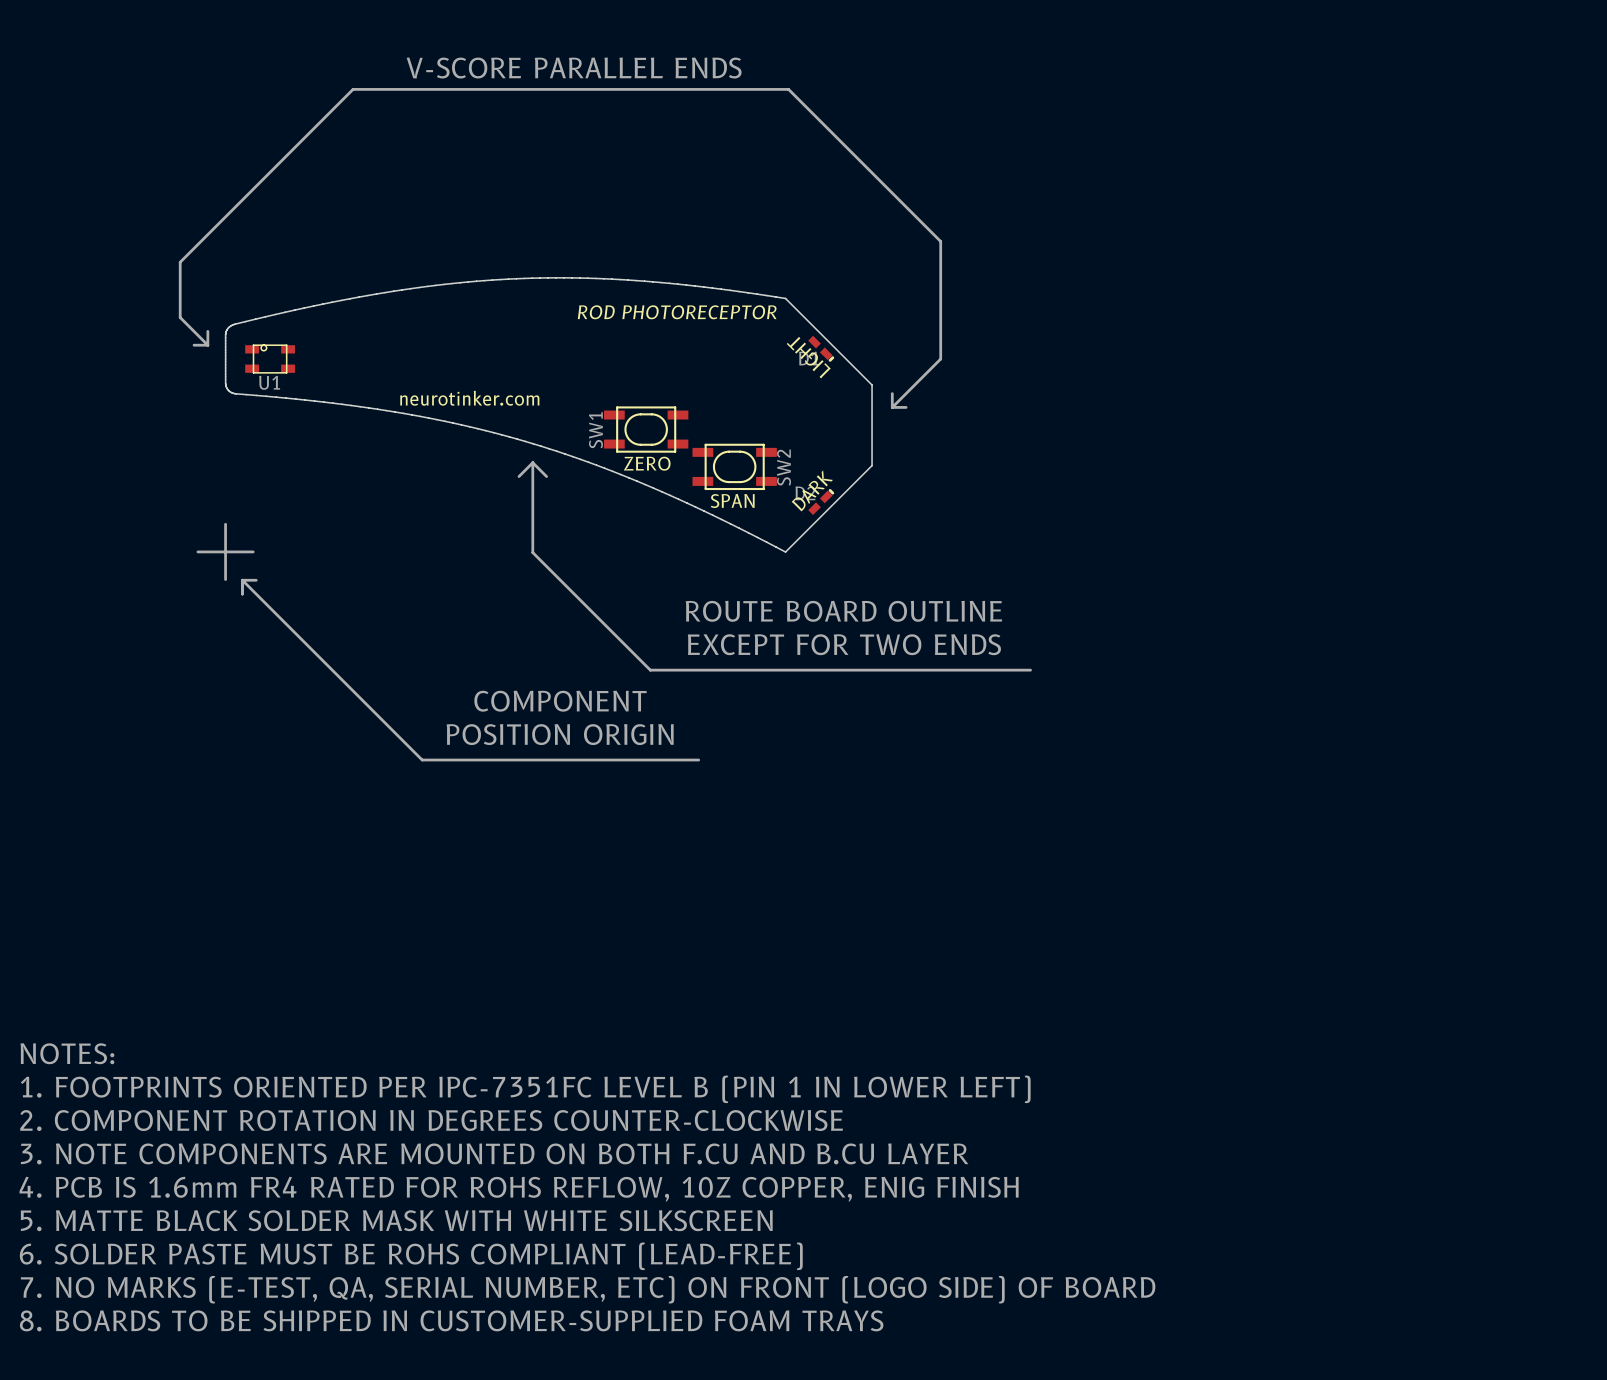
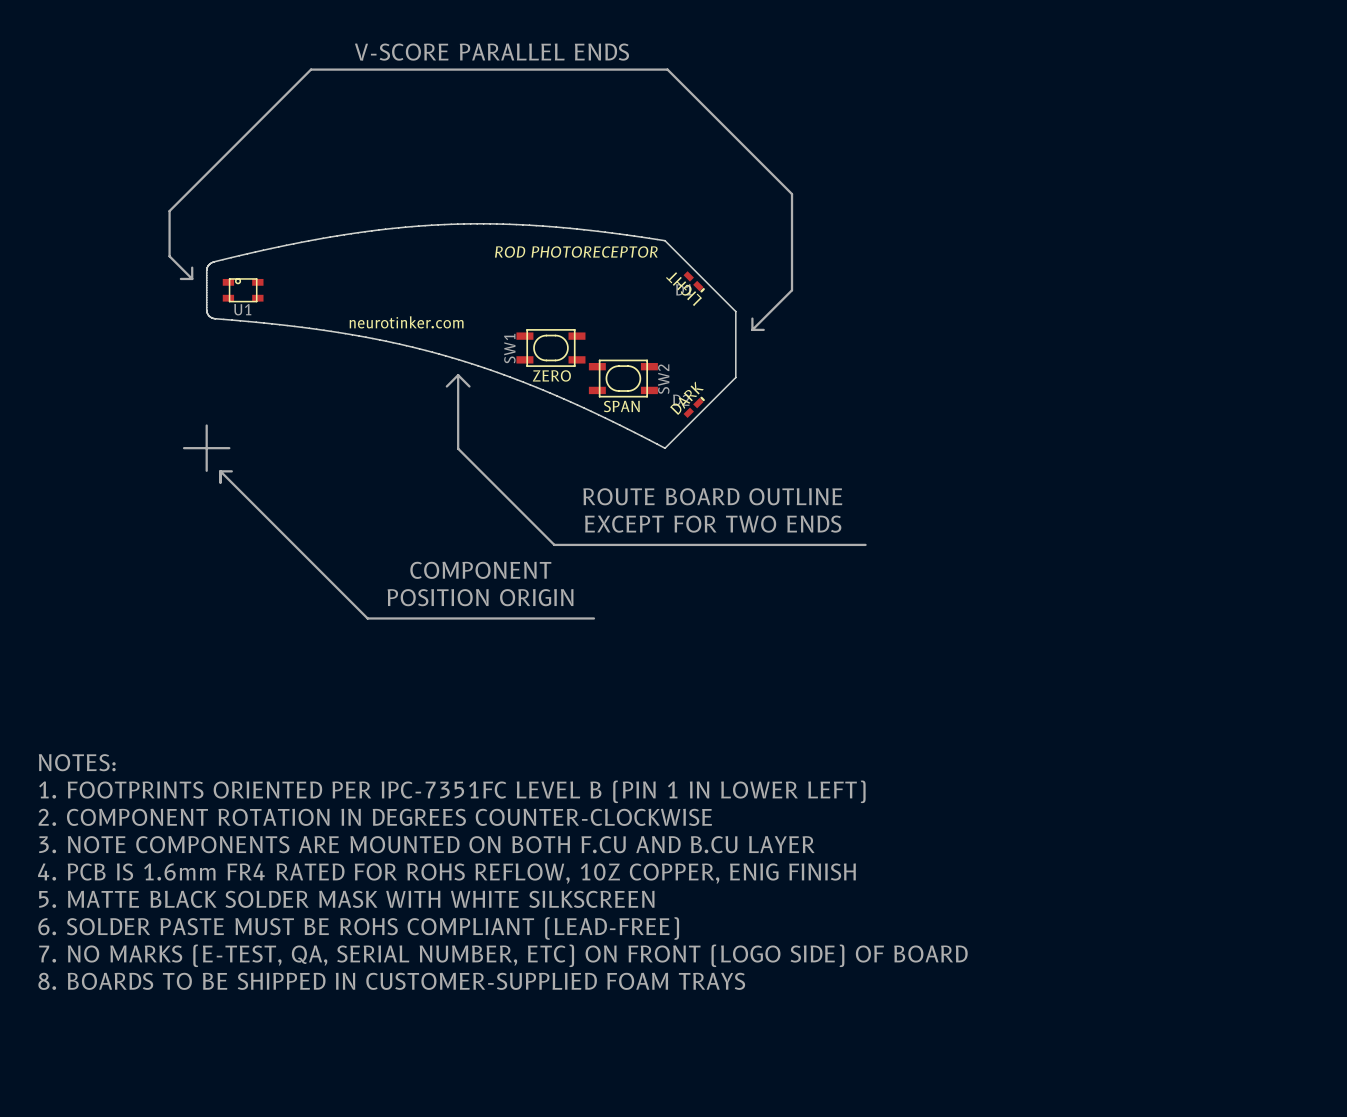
text position: NOTES: (67, 1053) -> NOTES: (77, 762)
text position: 1. FOOTPRINTS ORIENTED PER IPC-7351FC LEVEL B (PIN 1 IN LOWER LEFT) (525, 1089) -> 1. FOOTPRINTS ORIENTED PER IPC-7351FC LEVEL B (PIN 1 IN LOWER LEFT) (452, 791)
text position: 2. COMPONENT ROTATION IN DEGREES COUNTER-CLOCKWISE (431, 1120) -> 2. COMPONENT ROTATION IN DEGREES COUNTER-CLOCKWISE (375, 817)
text position: 3. NOTE COMPONENTS ARE MOUNTED ON BOTH F.CU AND B.CU LAYER (494, 1153) -> 3. NOTE COMPONENTS ARE MOUNTED ON BOTH F.CU AND B.CU LAYER (426, 844)
text position: 4. PCB IS 1.6mm FR4 RATED FOR ROHS REFLOW, 10Z COPPER, ENIG FINISH (519, 1189) -> 4. PCB IS 1.6mm FR4 RATED FOR ROHS REFLOW, 10Z COPPER, ENIG FINISH (446, 873)
text position: 5. MATTE BLACK SOLDER MASK WITH WHITE SILKSCREEN (396, 1220) -> 5. MATTE BLACK SOLDER MASK WITH WHITE SILKSCREEN (346, 899)
text position: 6. SOLDER PASTE MUST BE ROHS COMPLIANT (LEAD-FREE) (411, 1256) -> 6. SOLDER PASTE MUST BE ROHS COMPLIANT (LEAD-FREE) (358, 928)
text position: 7. NO MARKS (E-TEST, QA, SERIAL NUMBER, ETC) ON FRONT (LOGO SIDE) OF BOARD (588, 1289) -> 7. NO MARKS (E-TEST, QA, SERIAL NUMBER, ETC) ON FRONT (LOGO SIDE) OF BOARD (503, 955)
text position: 8. BOARDS TO BE SHIPPED IN CUSTOMER-SUPPLIED FOAM TRAYS (451, 1320) -> 8. BOARDS TO BE SHIPPED IN CUSTOMER-SUPPLIED FOAM TRAYS (391, 981)

